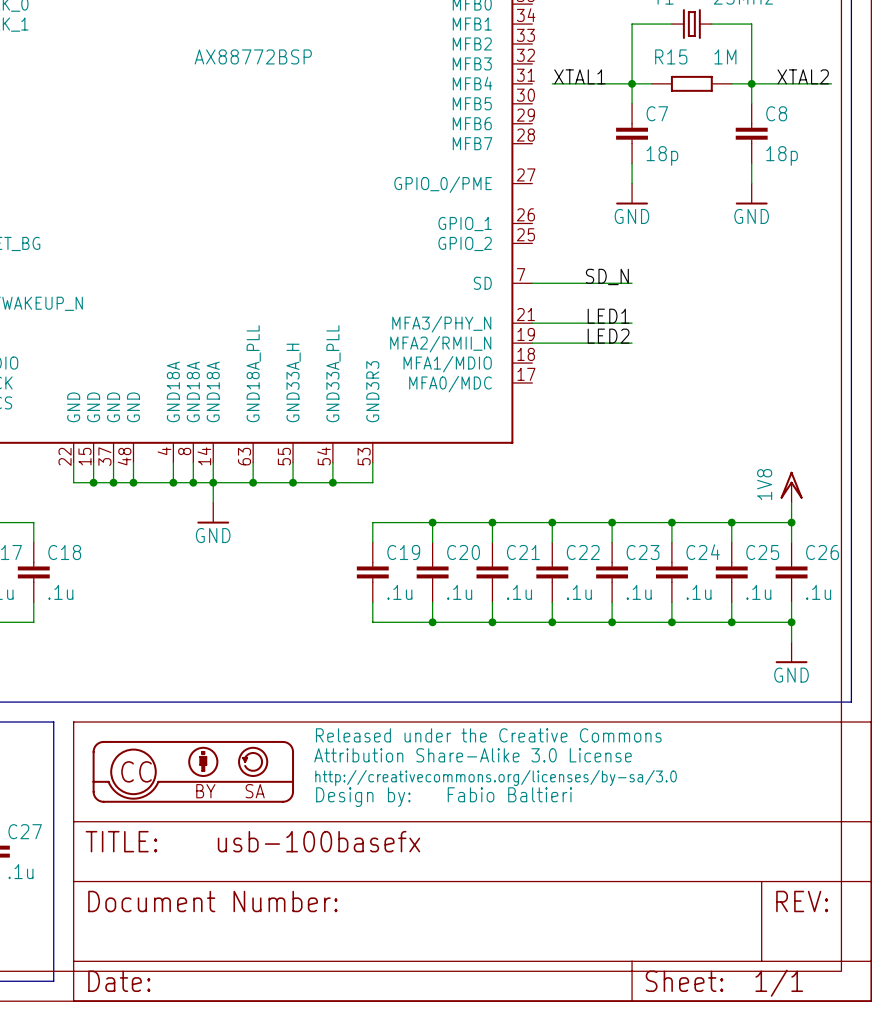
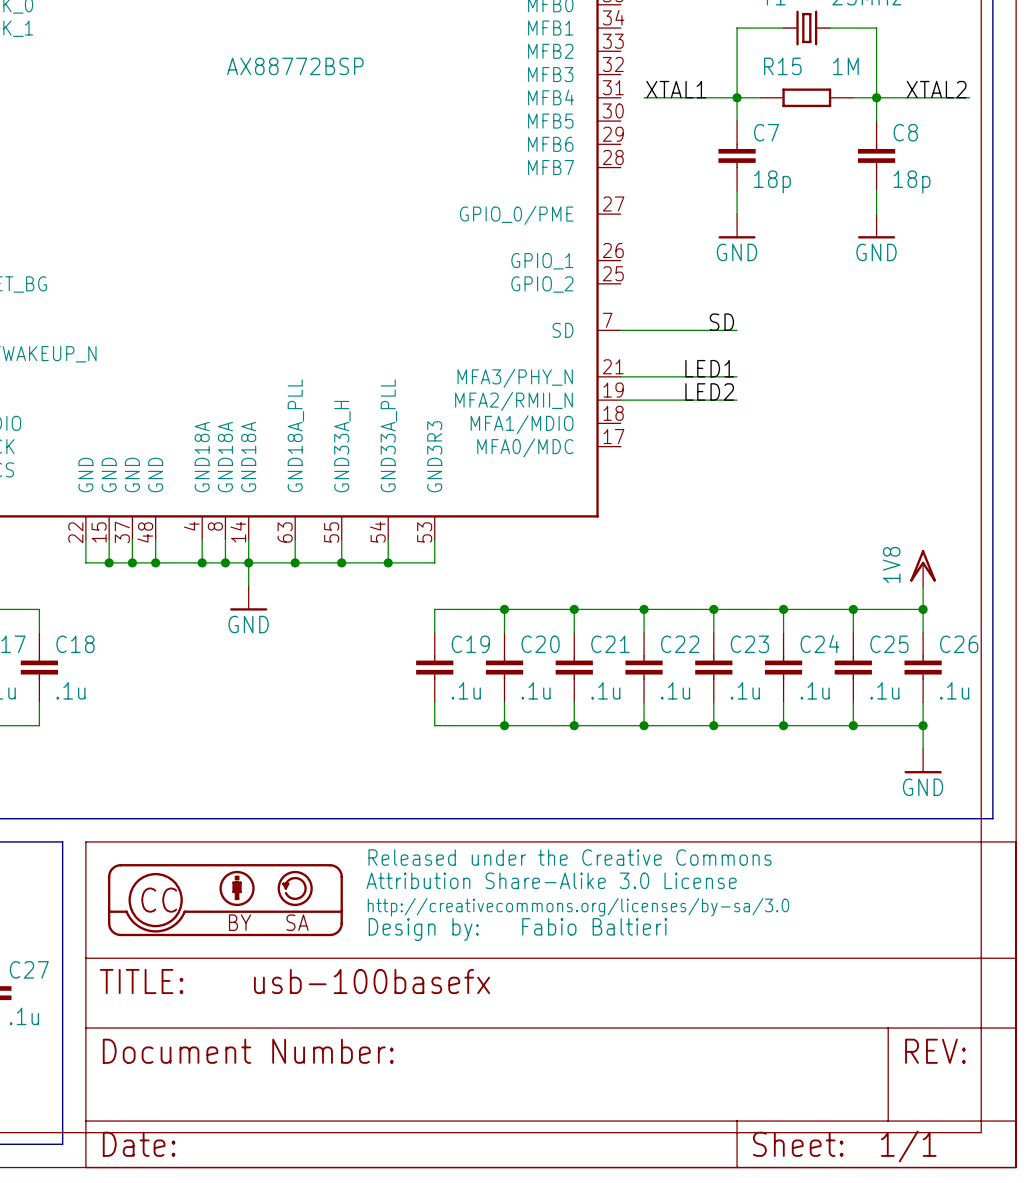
label: SD_N (607, 276) -> SD (721, 322)

